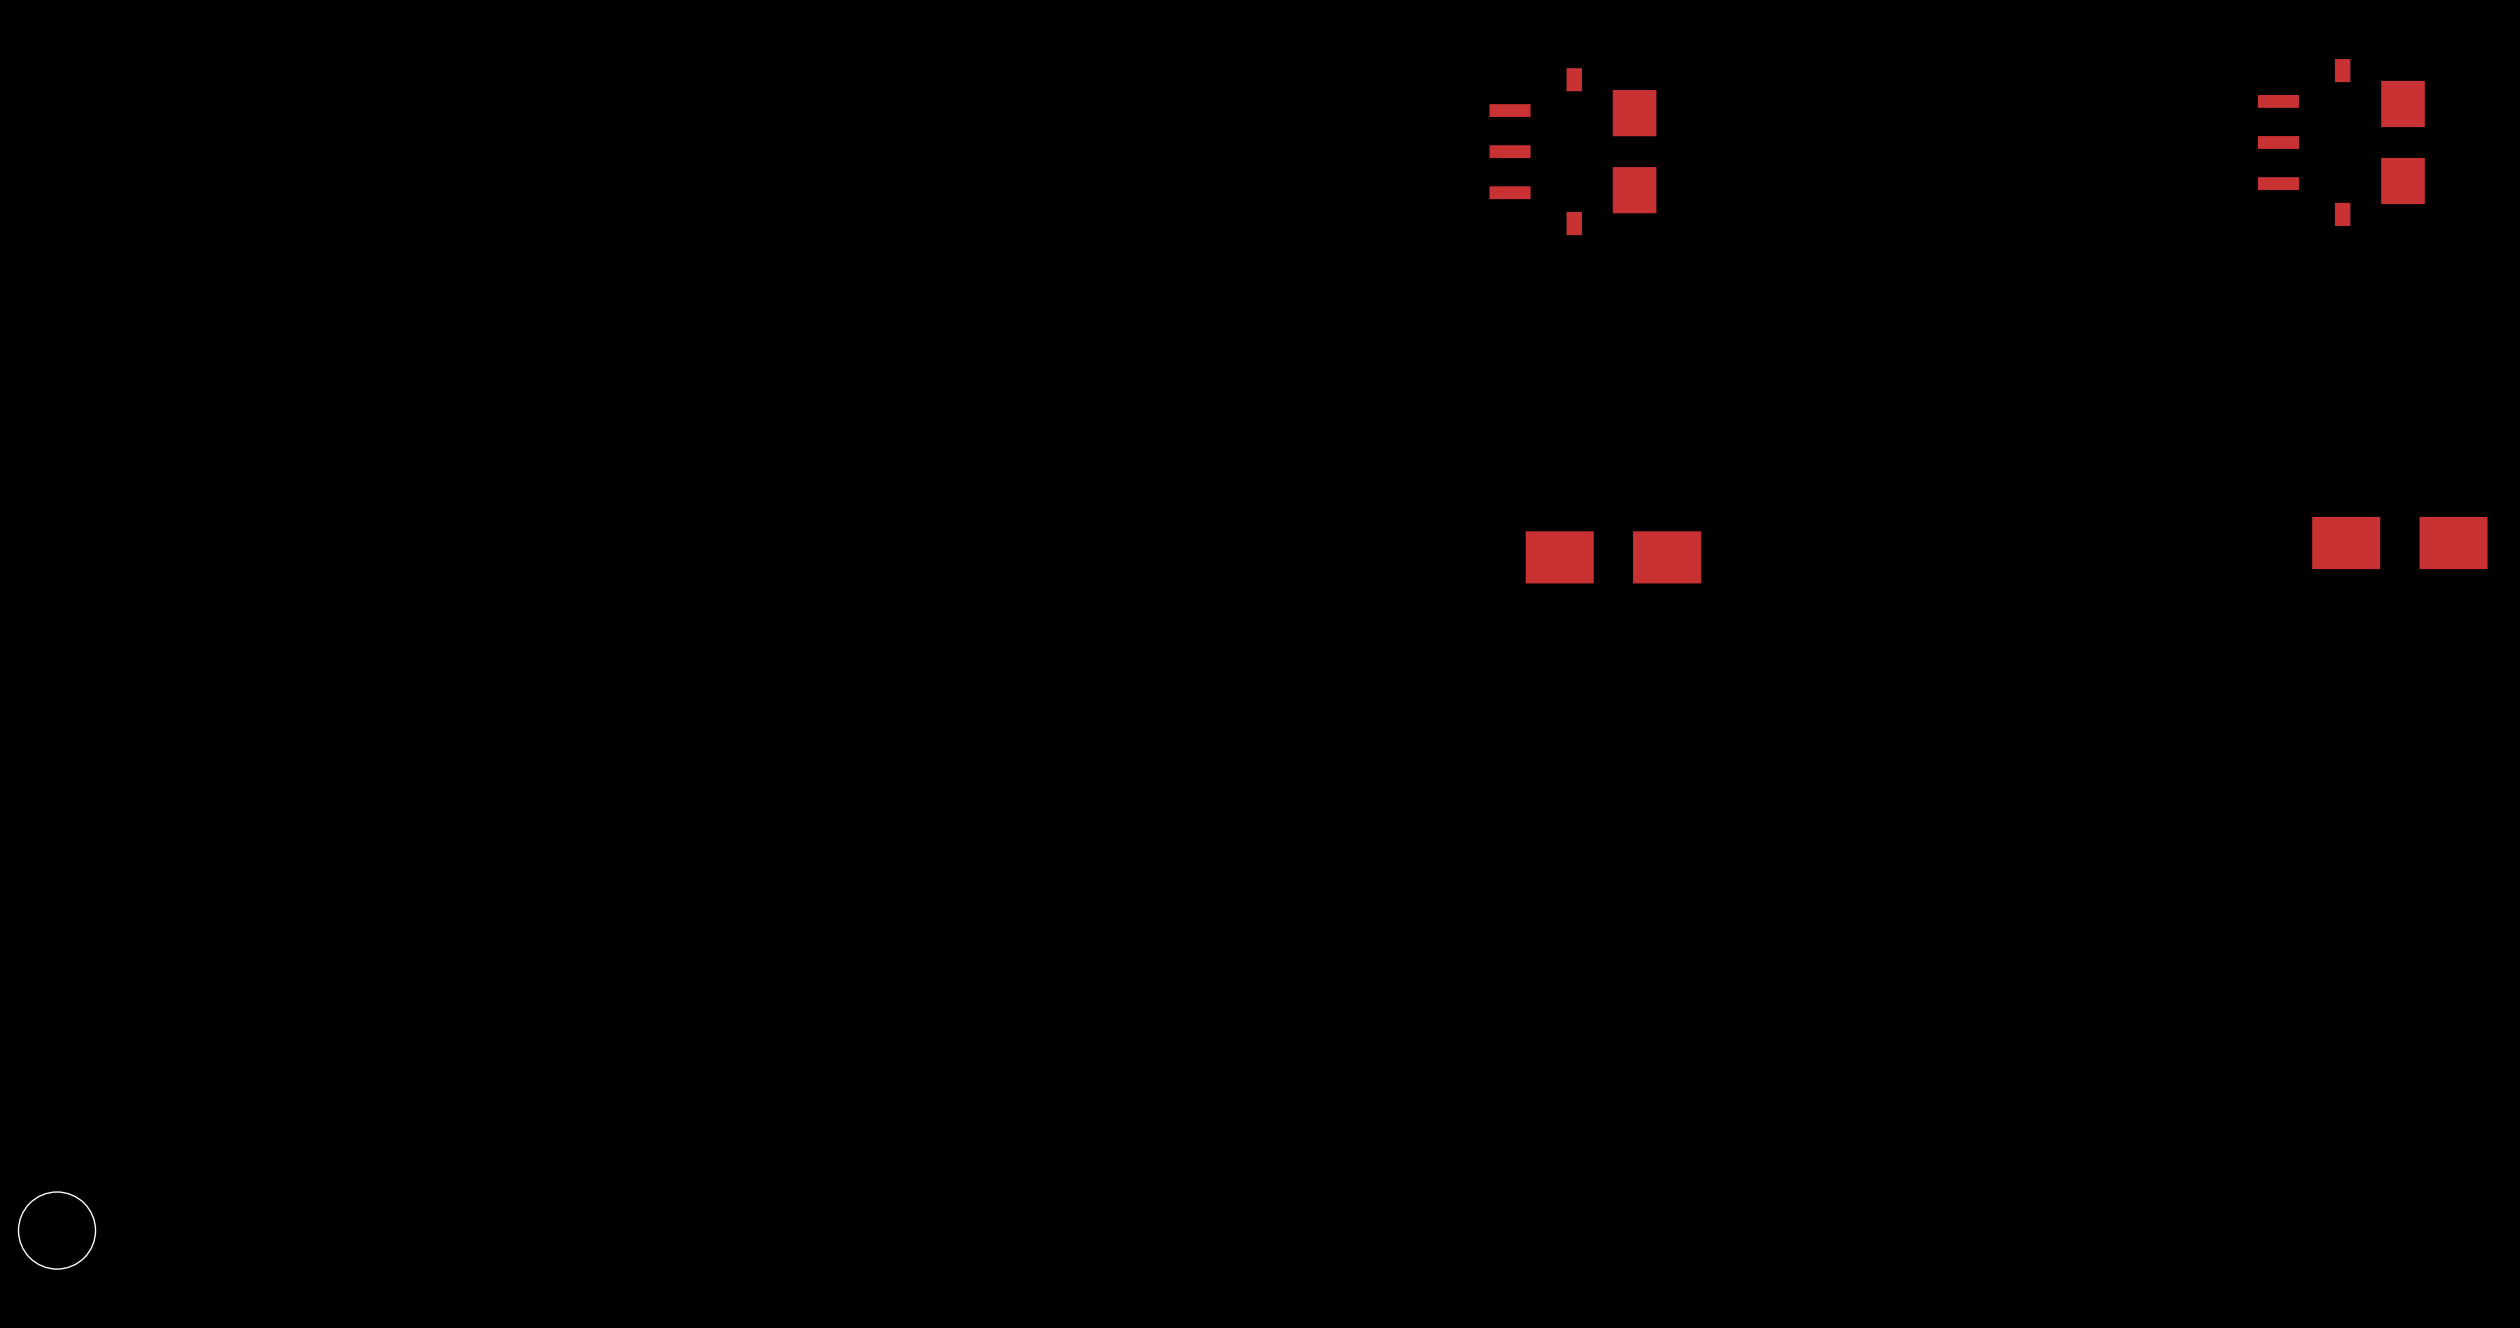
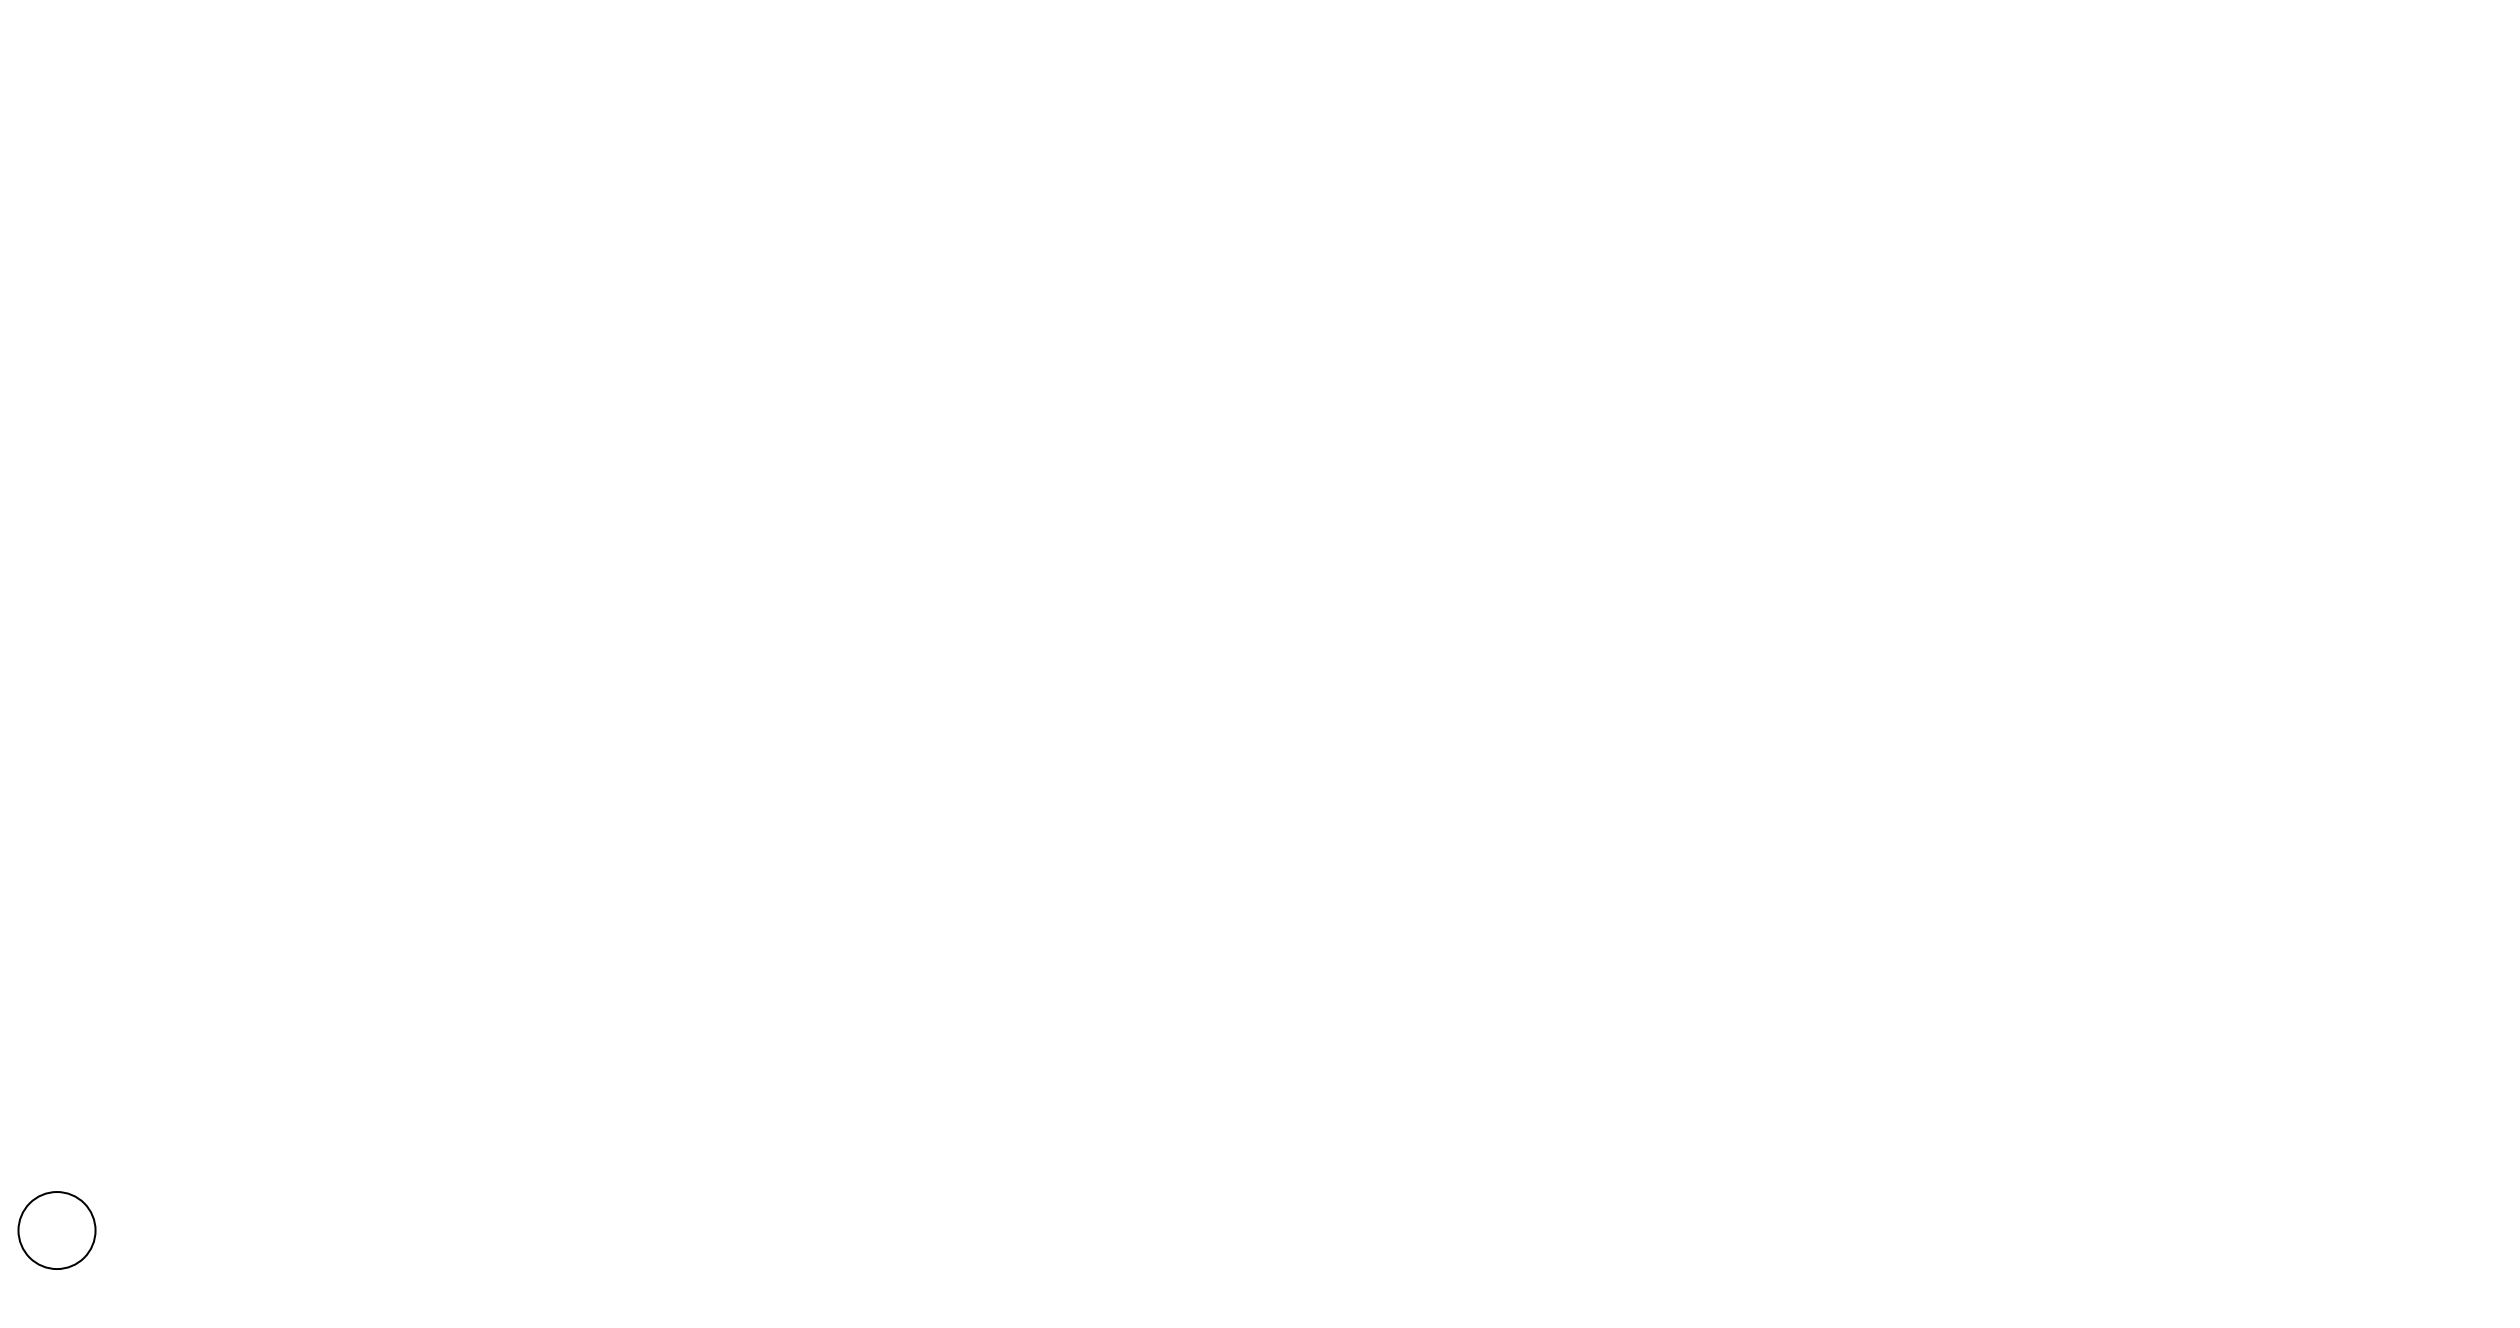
part: (2341, 142) -> none
part: (1572, 151) -> none
part: (2399, 543) -> none
part: (1613, 557) -> none

